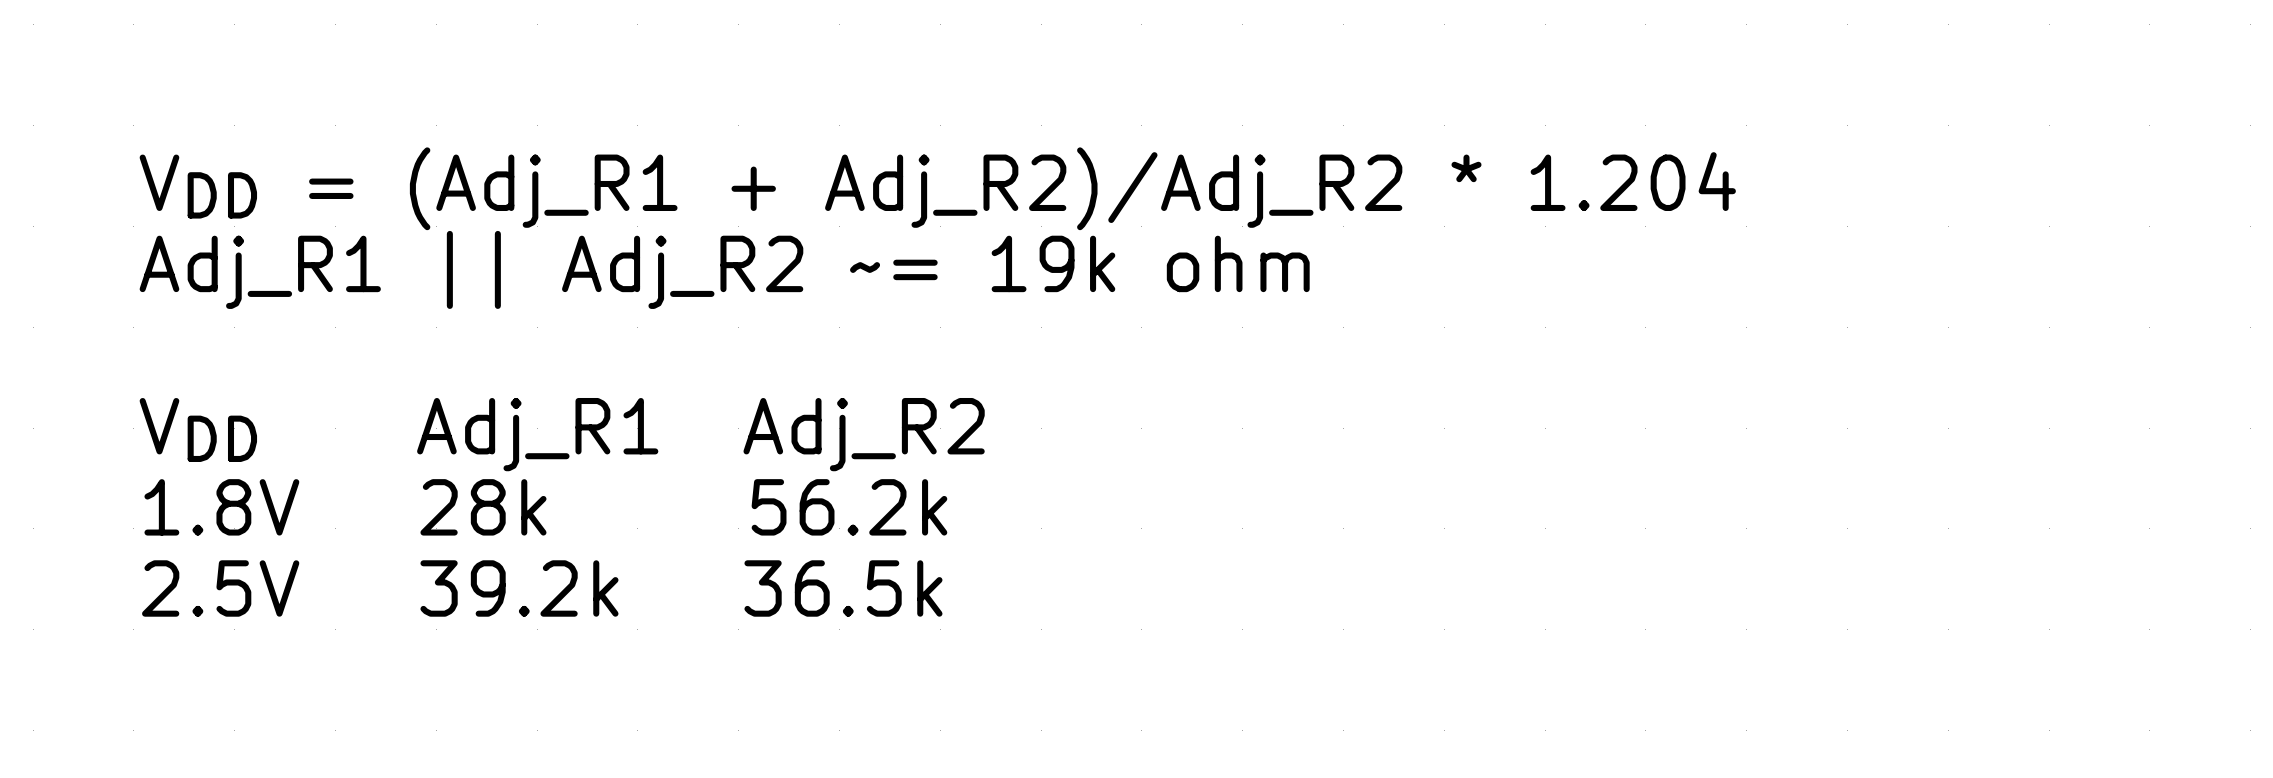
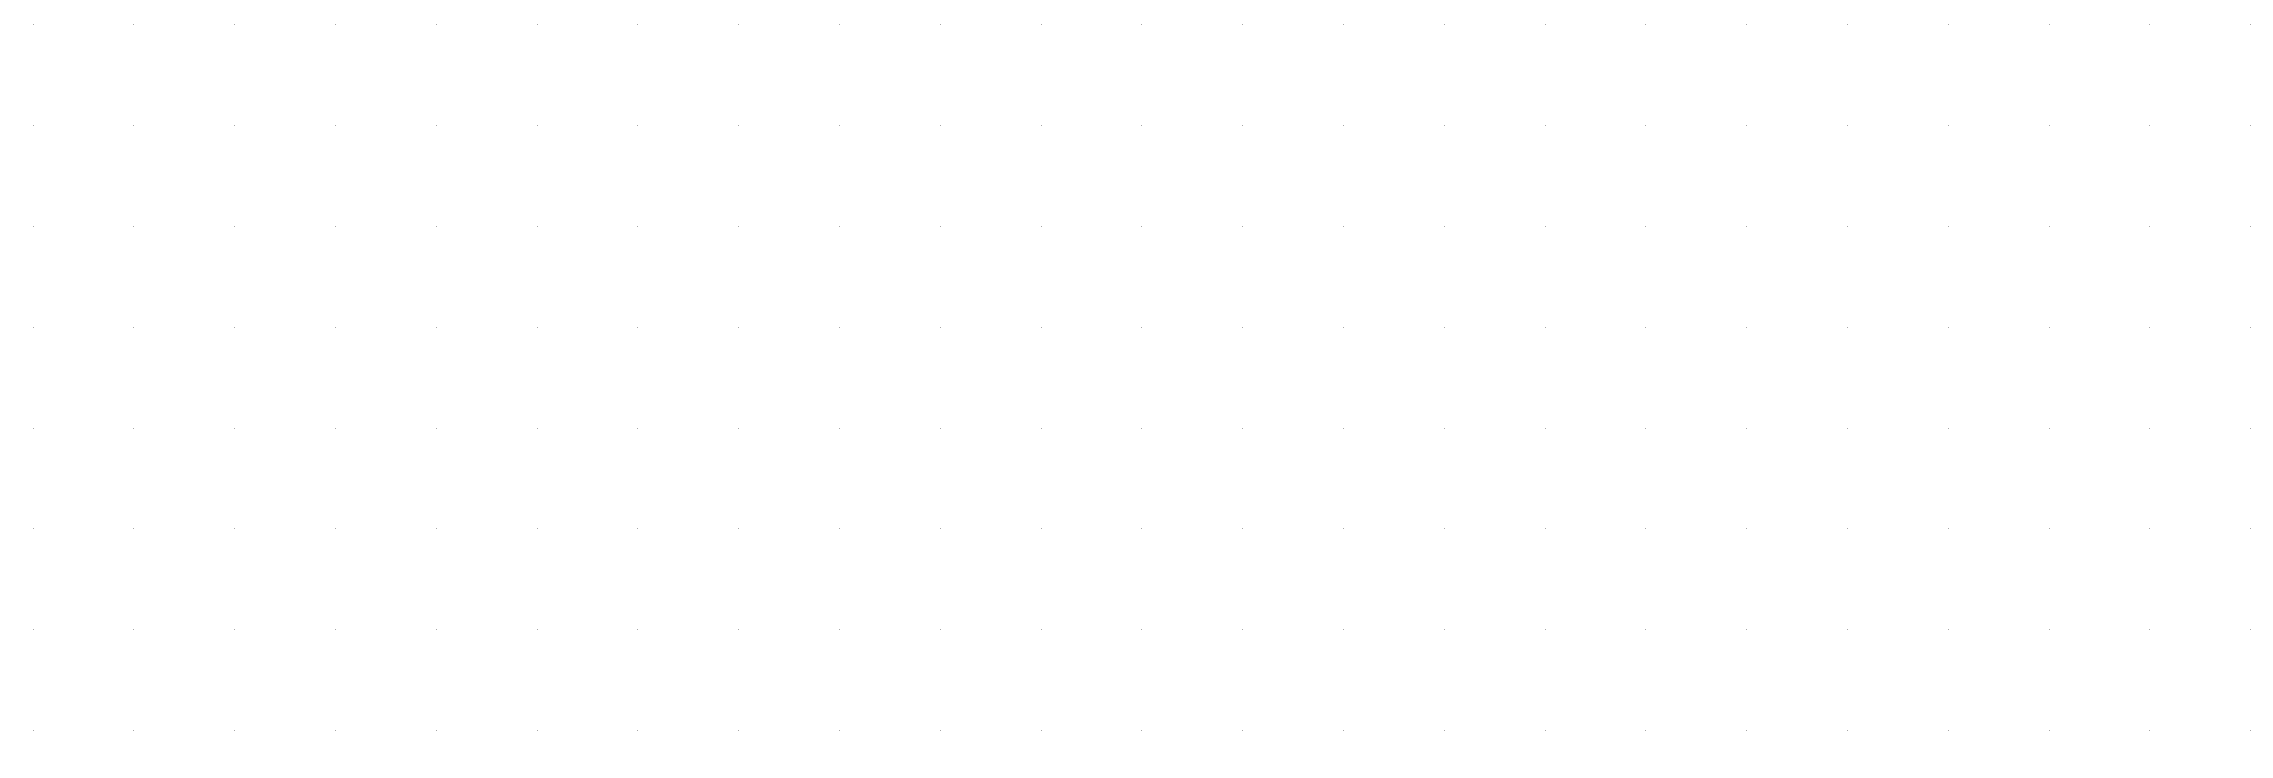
text: VDD = (Adj_R1 + Adj_R2)/Adj_R2 * 1.204 (937, 188) -> none
text: Adj_R1 || Adj_R2 ~= 19k ohm (724, 269) -> none
text: VDD Adj_R1 Adj_R2 (562, 434) -> none
text: 1.8V 28k 56.2k (545, 507) -> none
text: 2.5V 39.2k 36.5k (542, 588) -> none

